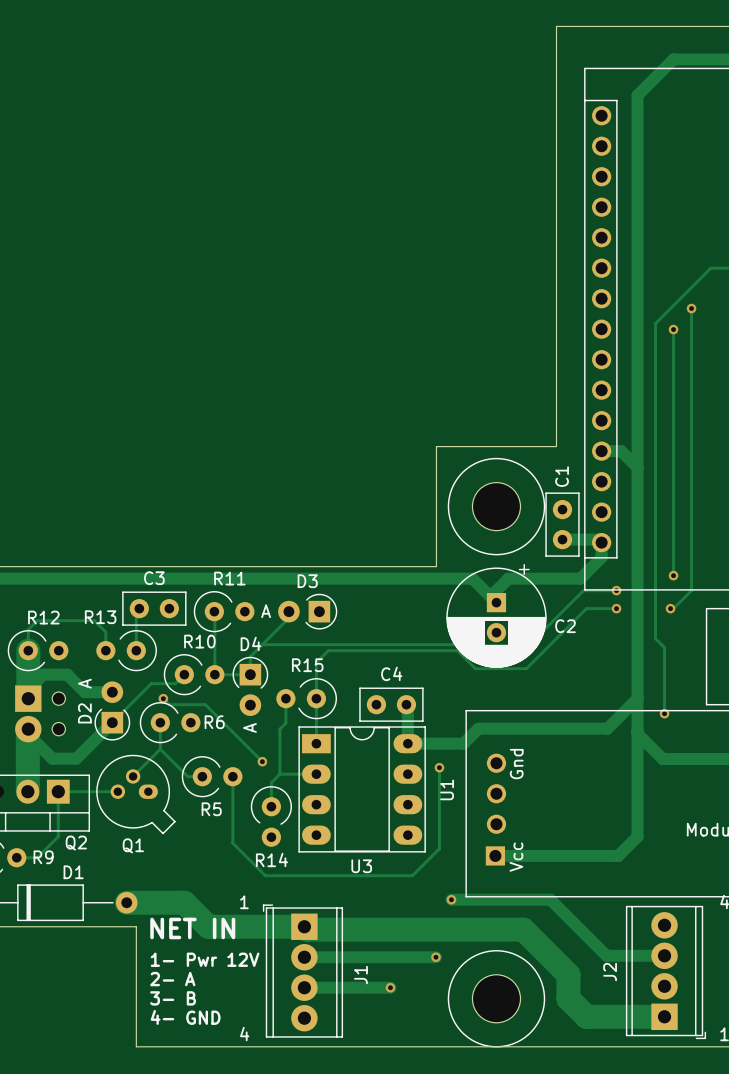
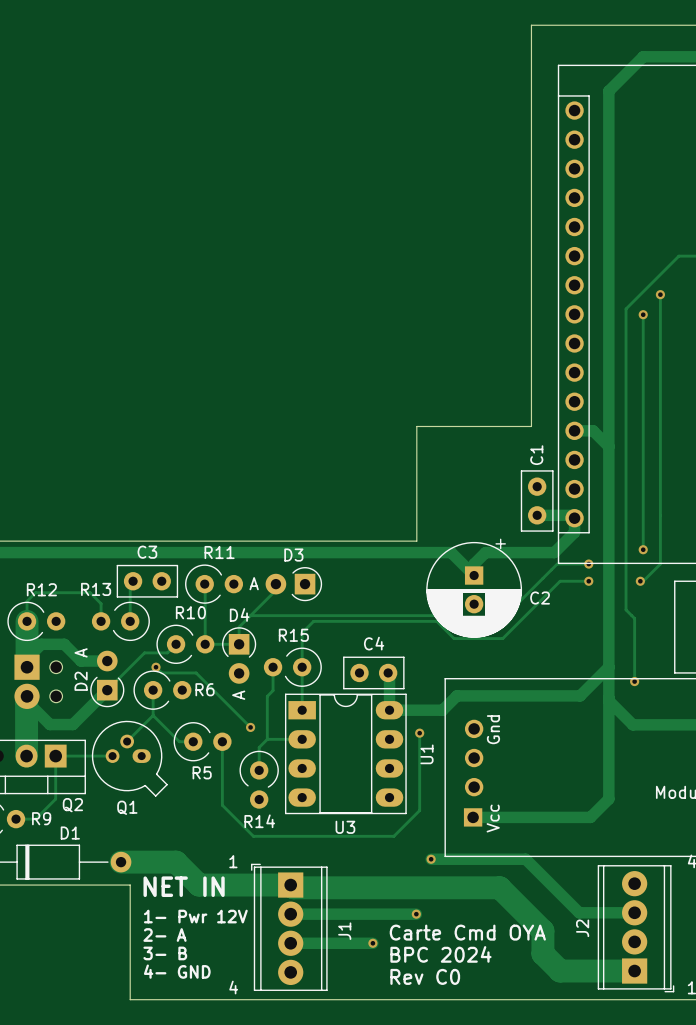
part: (496, 506) -> none
text: none -> Carte Cmd OYA (467, 932)
part: (496, 998) -> none
text: none -> BPC 2024 (440, 954)
text: none -> Rev C0 (425, 976)

